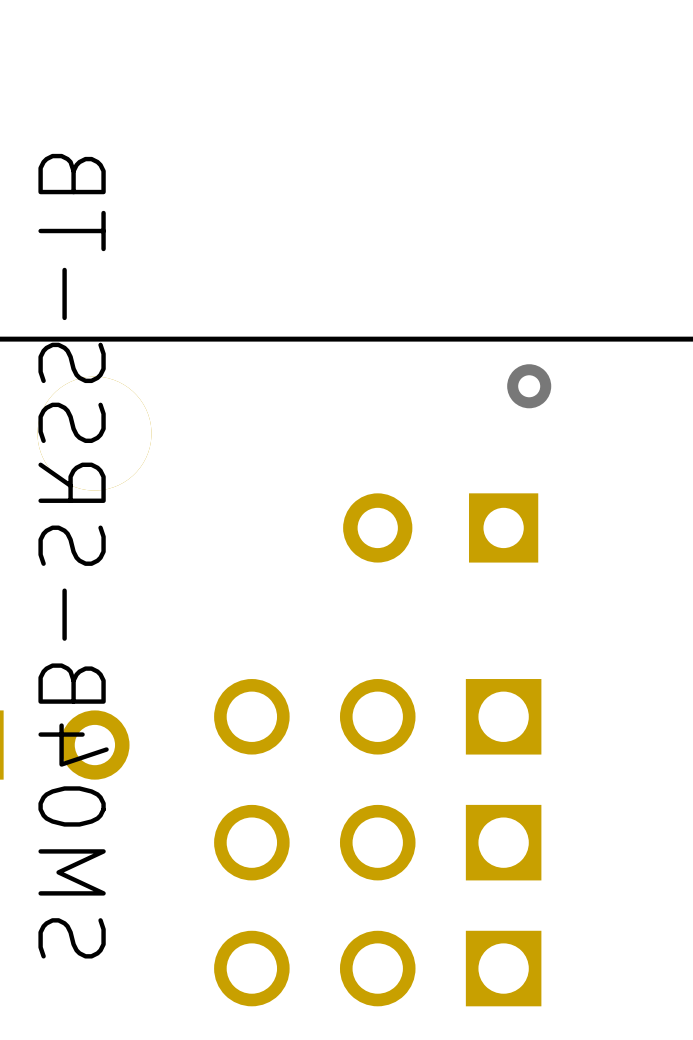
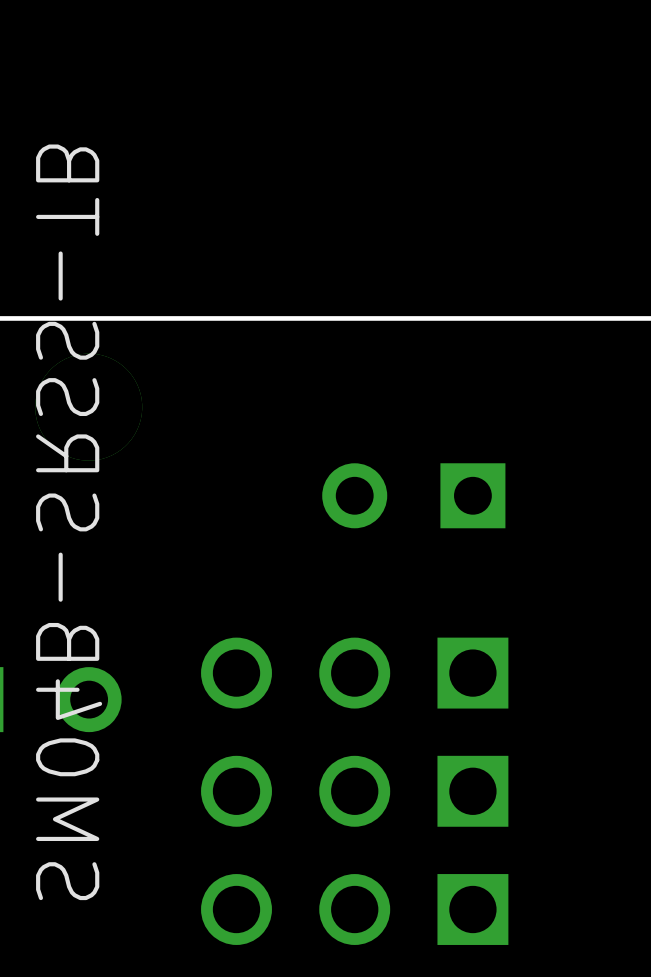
via: (529, 386) -> none

